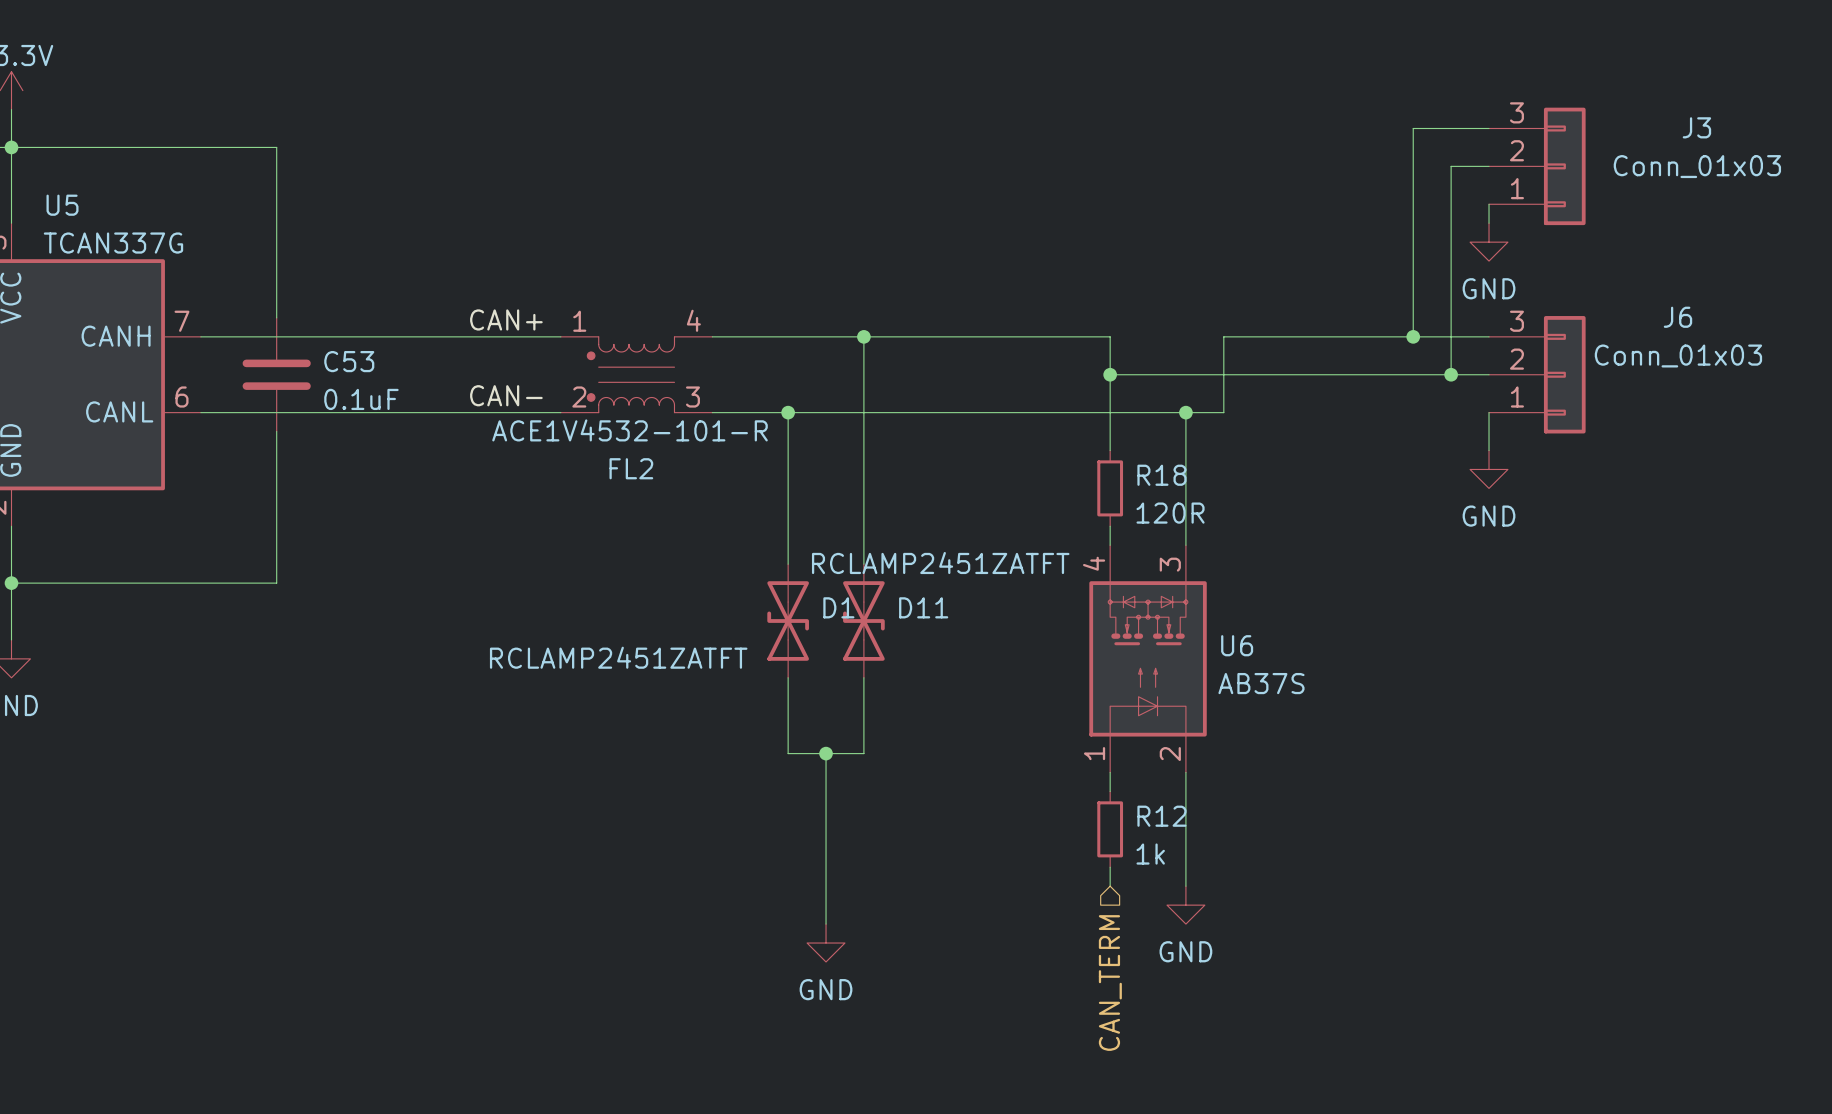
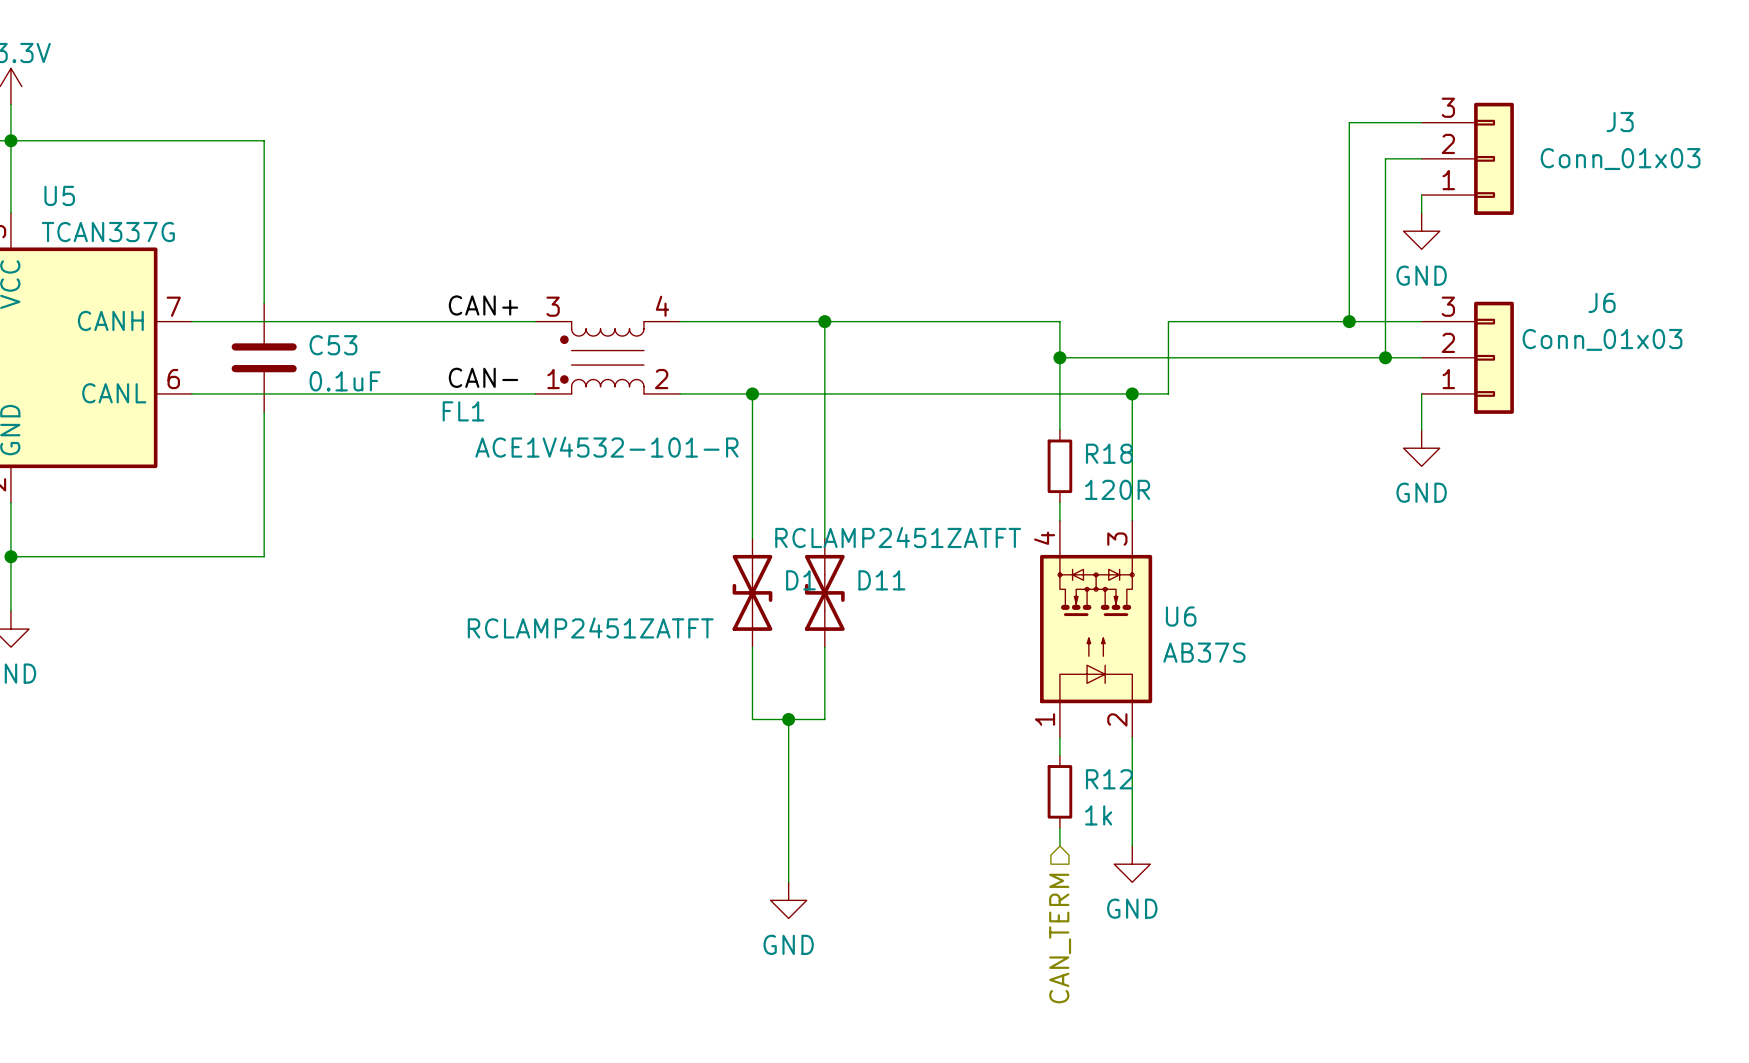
FL2 pin number: 1 (579, 321) -> 3 (553, 306)
FL2 pin number: 2 (579, 397) -> 1 (553, 379)
FL2 pin number: 3 (692, 397) -> 2 (661, 379)
FL2 value position: ACE1V4532-101-R (630, 430) -> ACE1V4532-101-R (606, 447)
FL2 name: FL2 (631, 468) -> FL1 (463, 411)

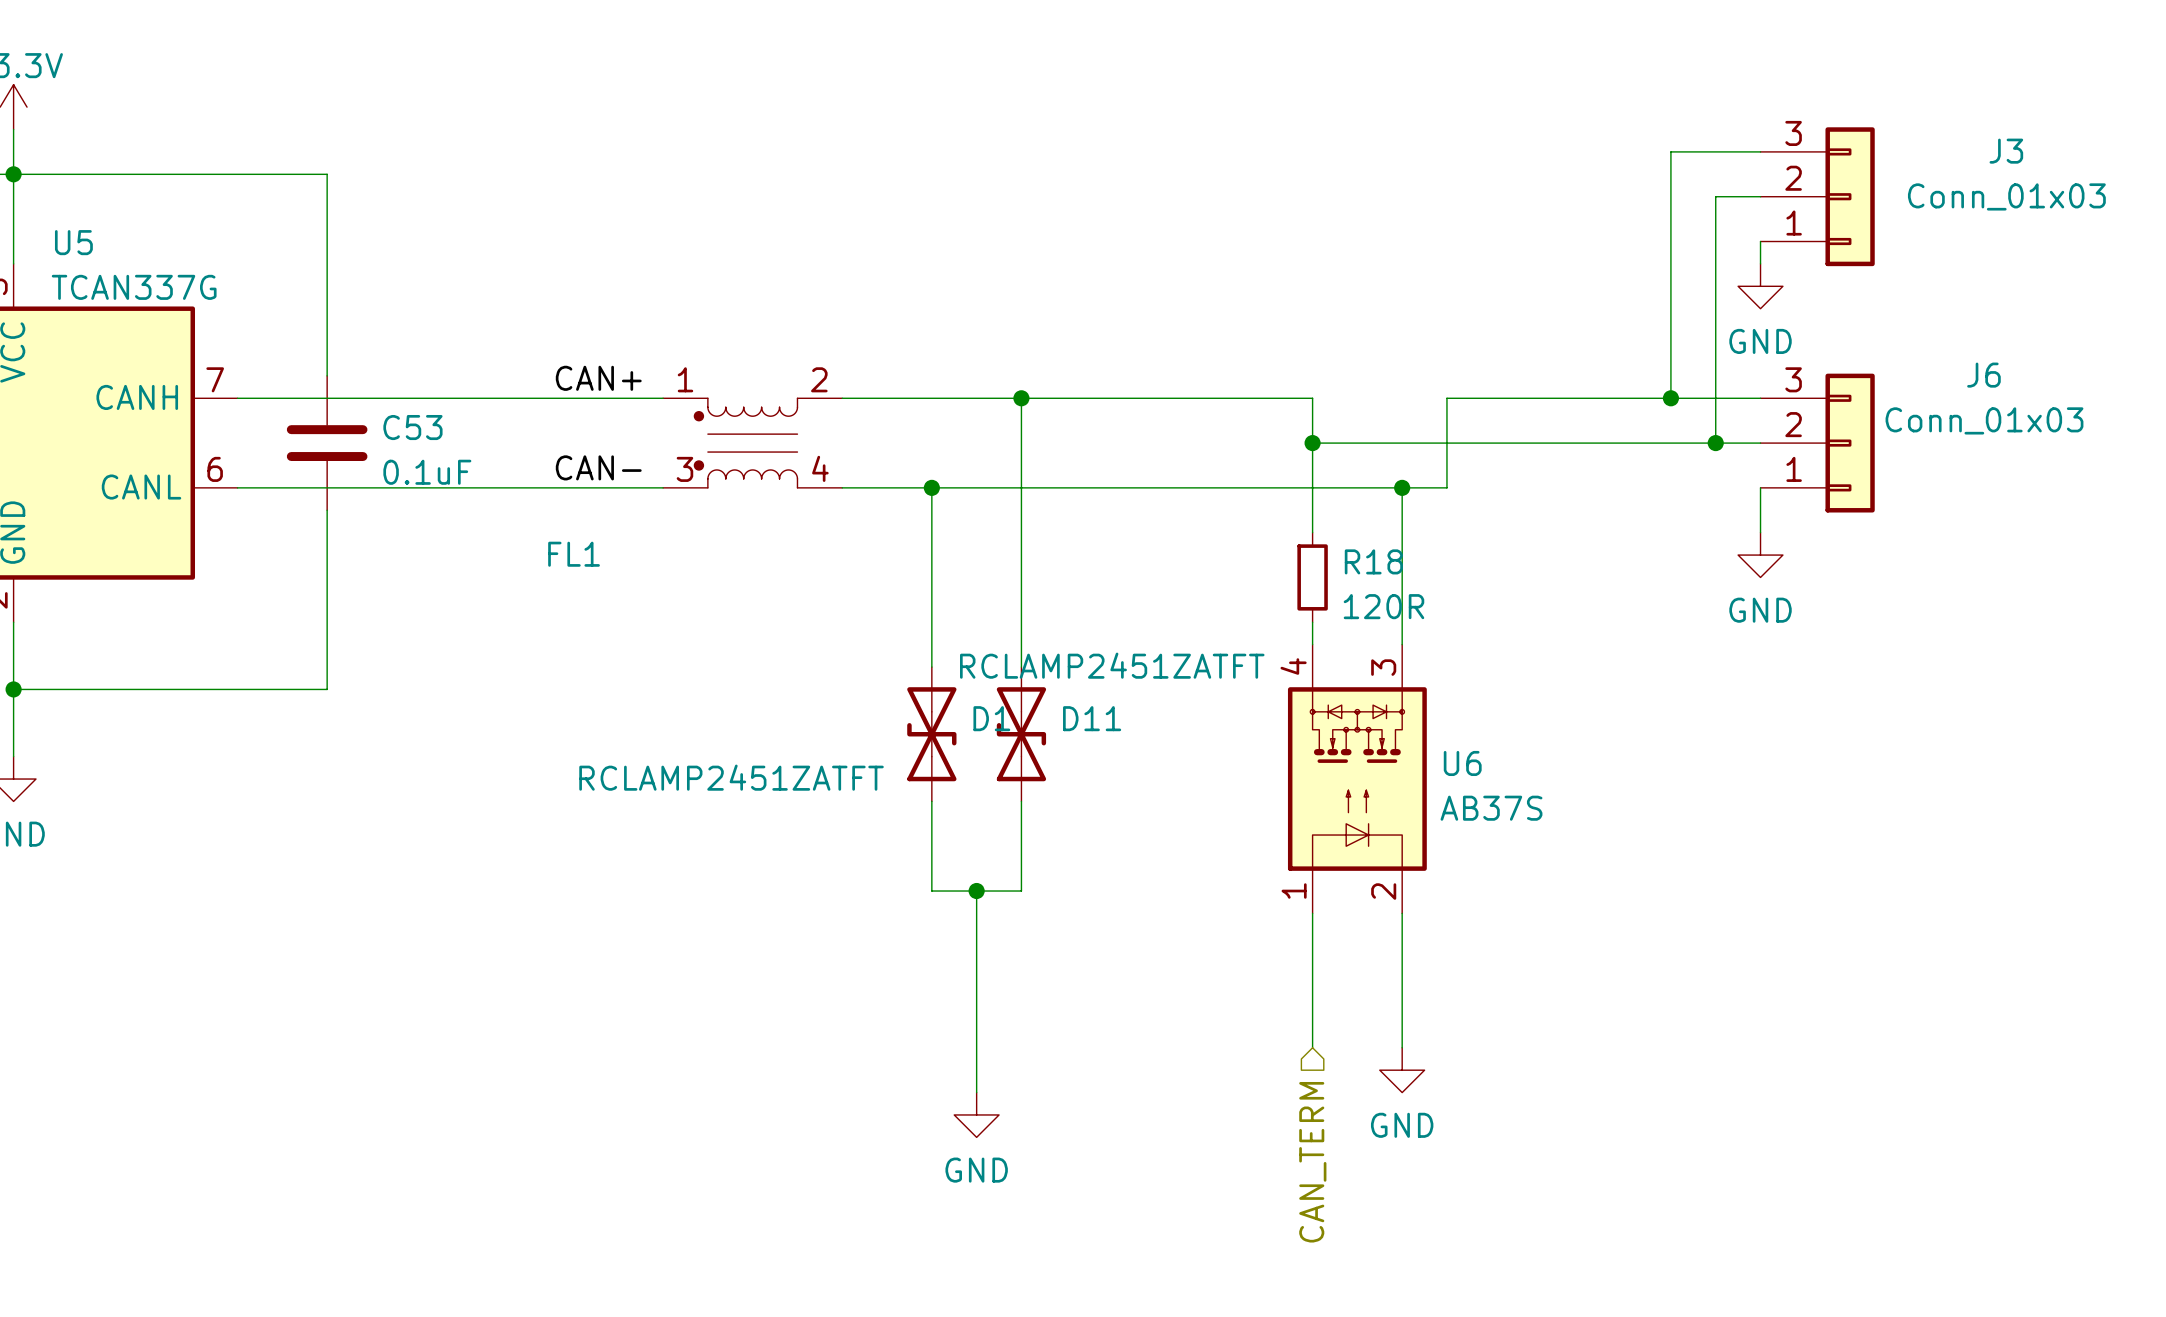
FL1 symbol: [535, 321, 681, 394] -> [663, 398, 843, 488]
FL1 name position: FL1 (463, 411) -> FL1 (574, 554)
FL1 value: ACE1V4532-101-R (606, 447) -> none
wire: none -> (1312, 935) (1312, 1025)
R12: 1k (1059, 791) -> none

